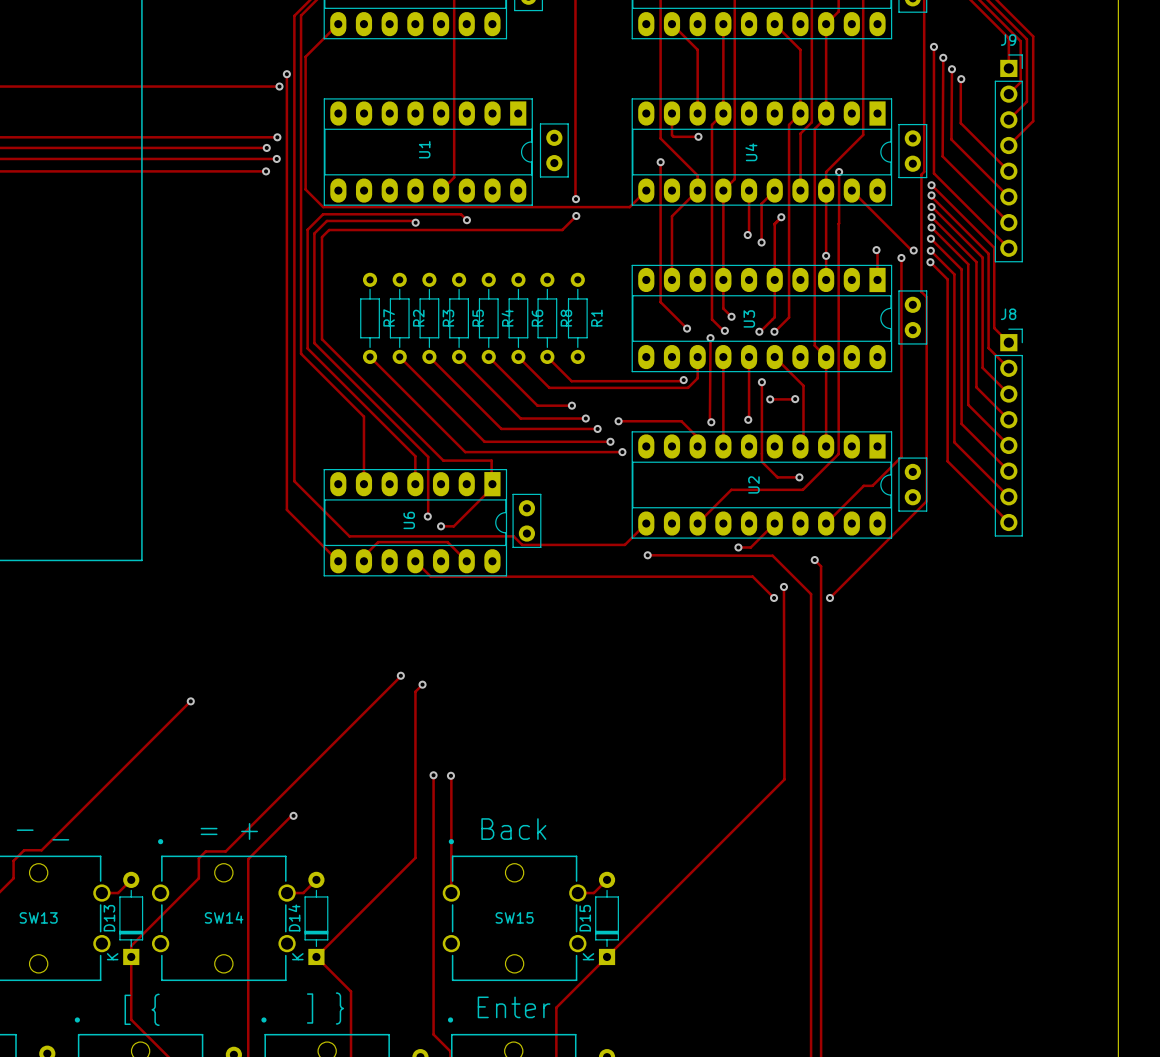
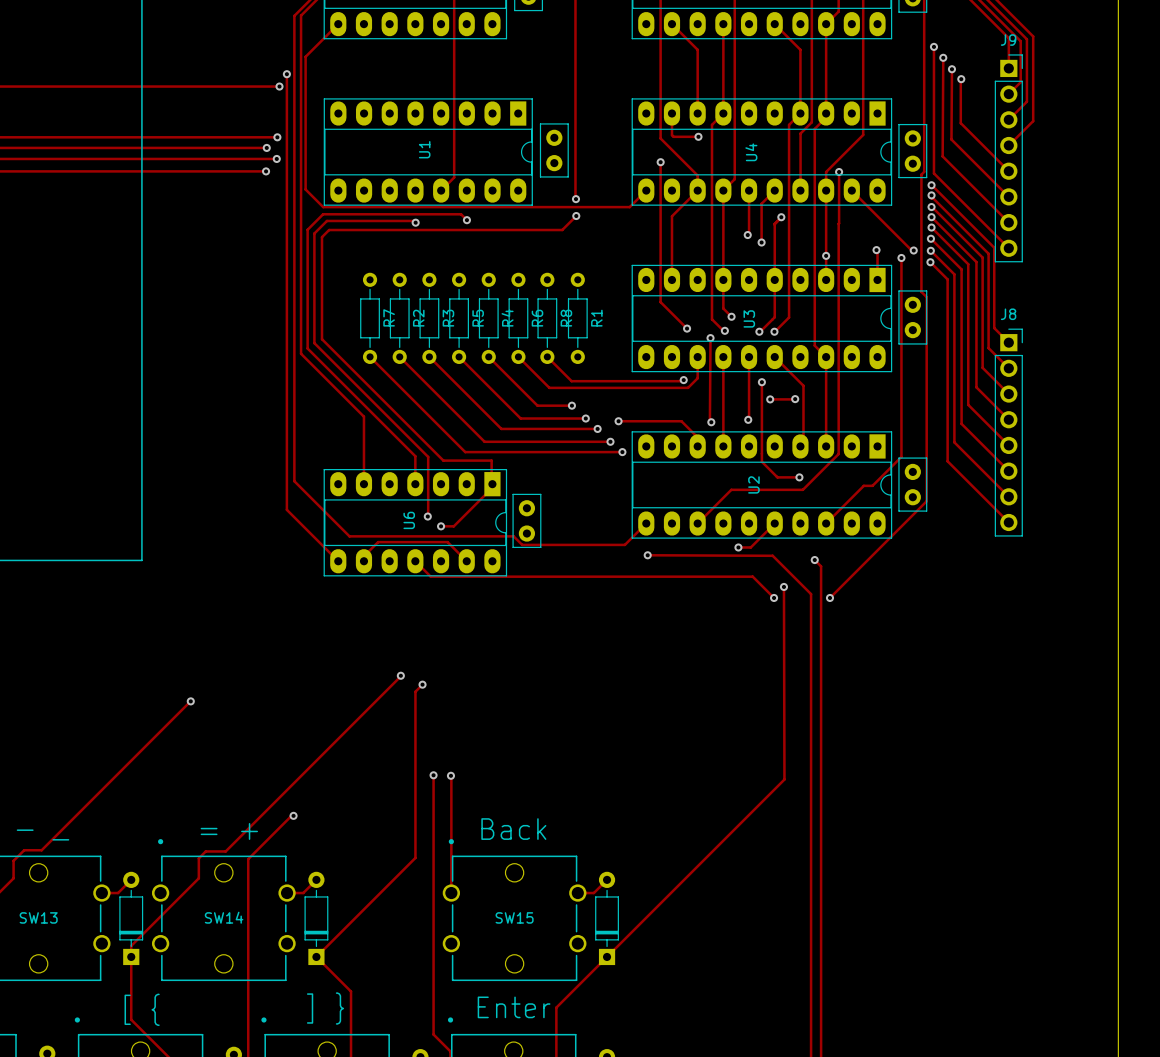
D14 name: D14 (294, 917) -> none
D13 name: D13 (109, 918) -> none
D15 name: D15 (585, 918) -> none
D13 text: K (112, 956) -> none
D14 text: K (297, 956) -> none
D15 text: K (588, 956) -> none

